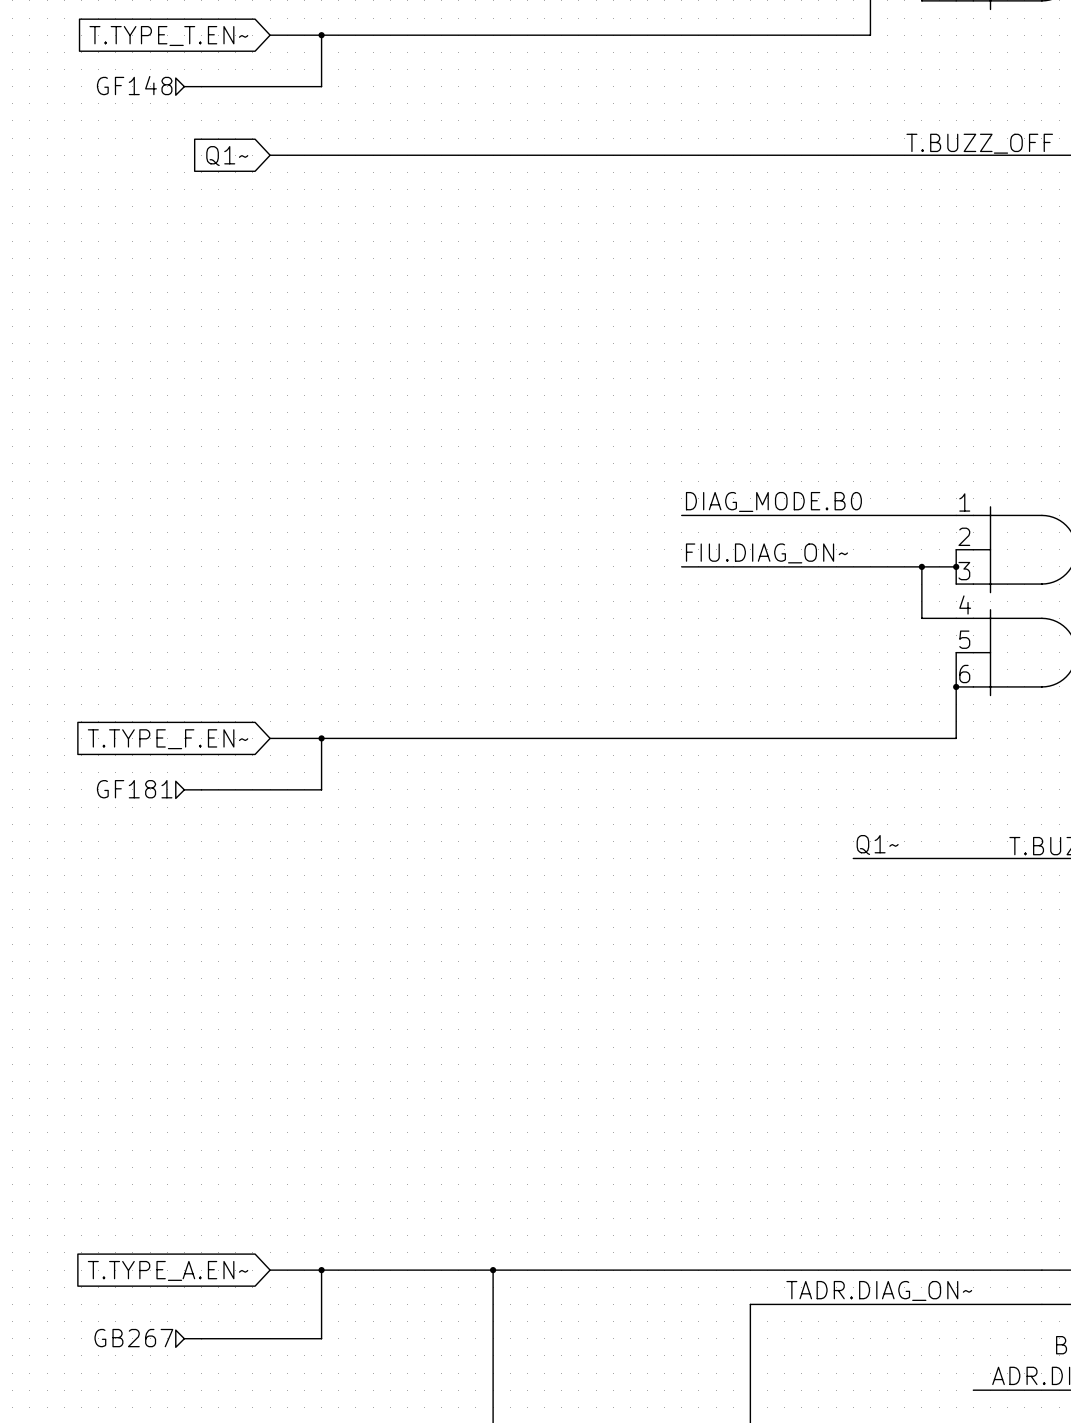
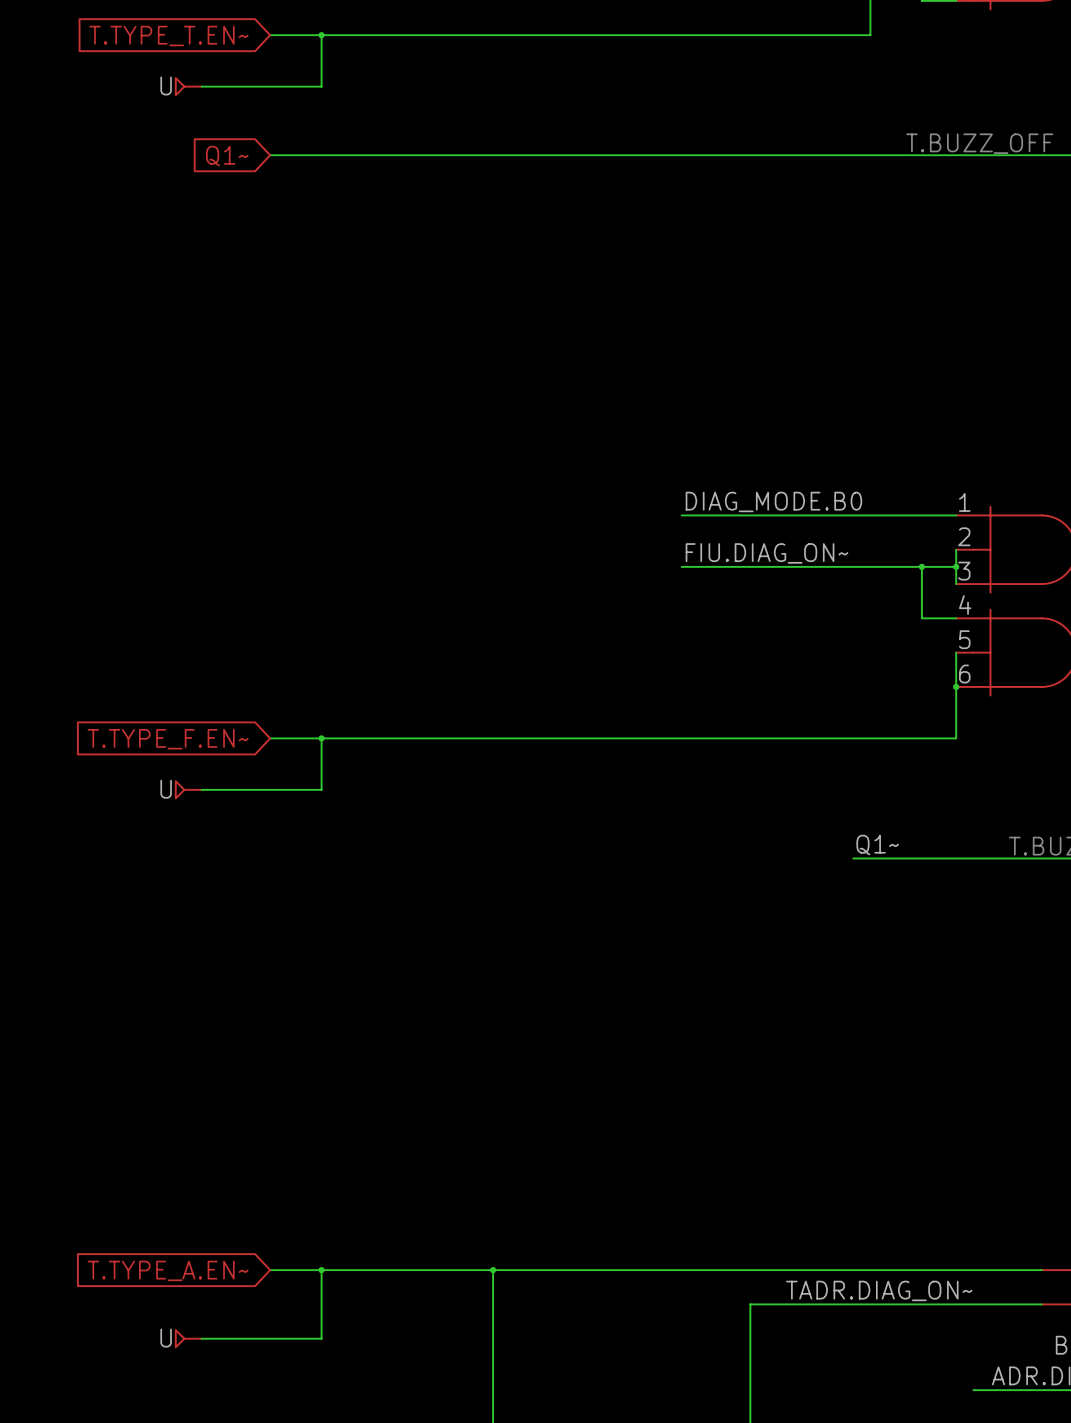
GF148 name: GF148 (134, 85) -> U (166, 86)
GF181 name: GF181 (134, 789) -> U (166, 789)
GB267 name: GB267 (133, 1338) -> U (166, 1338)

